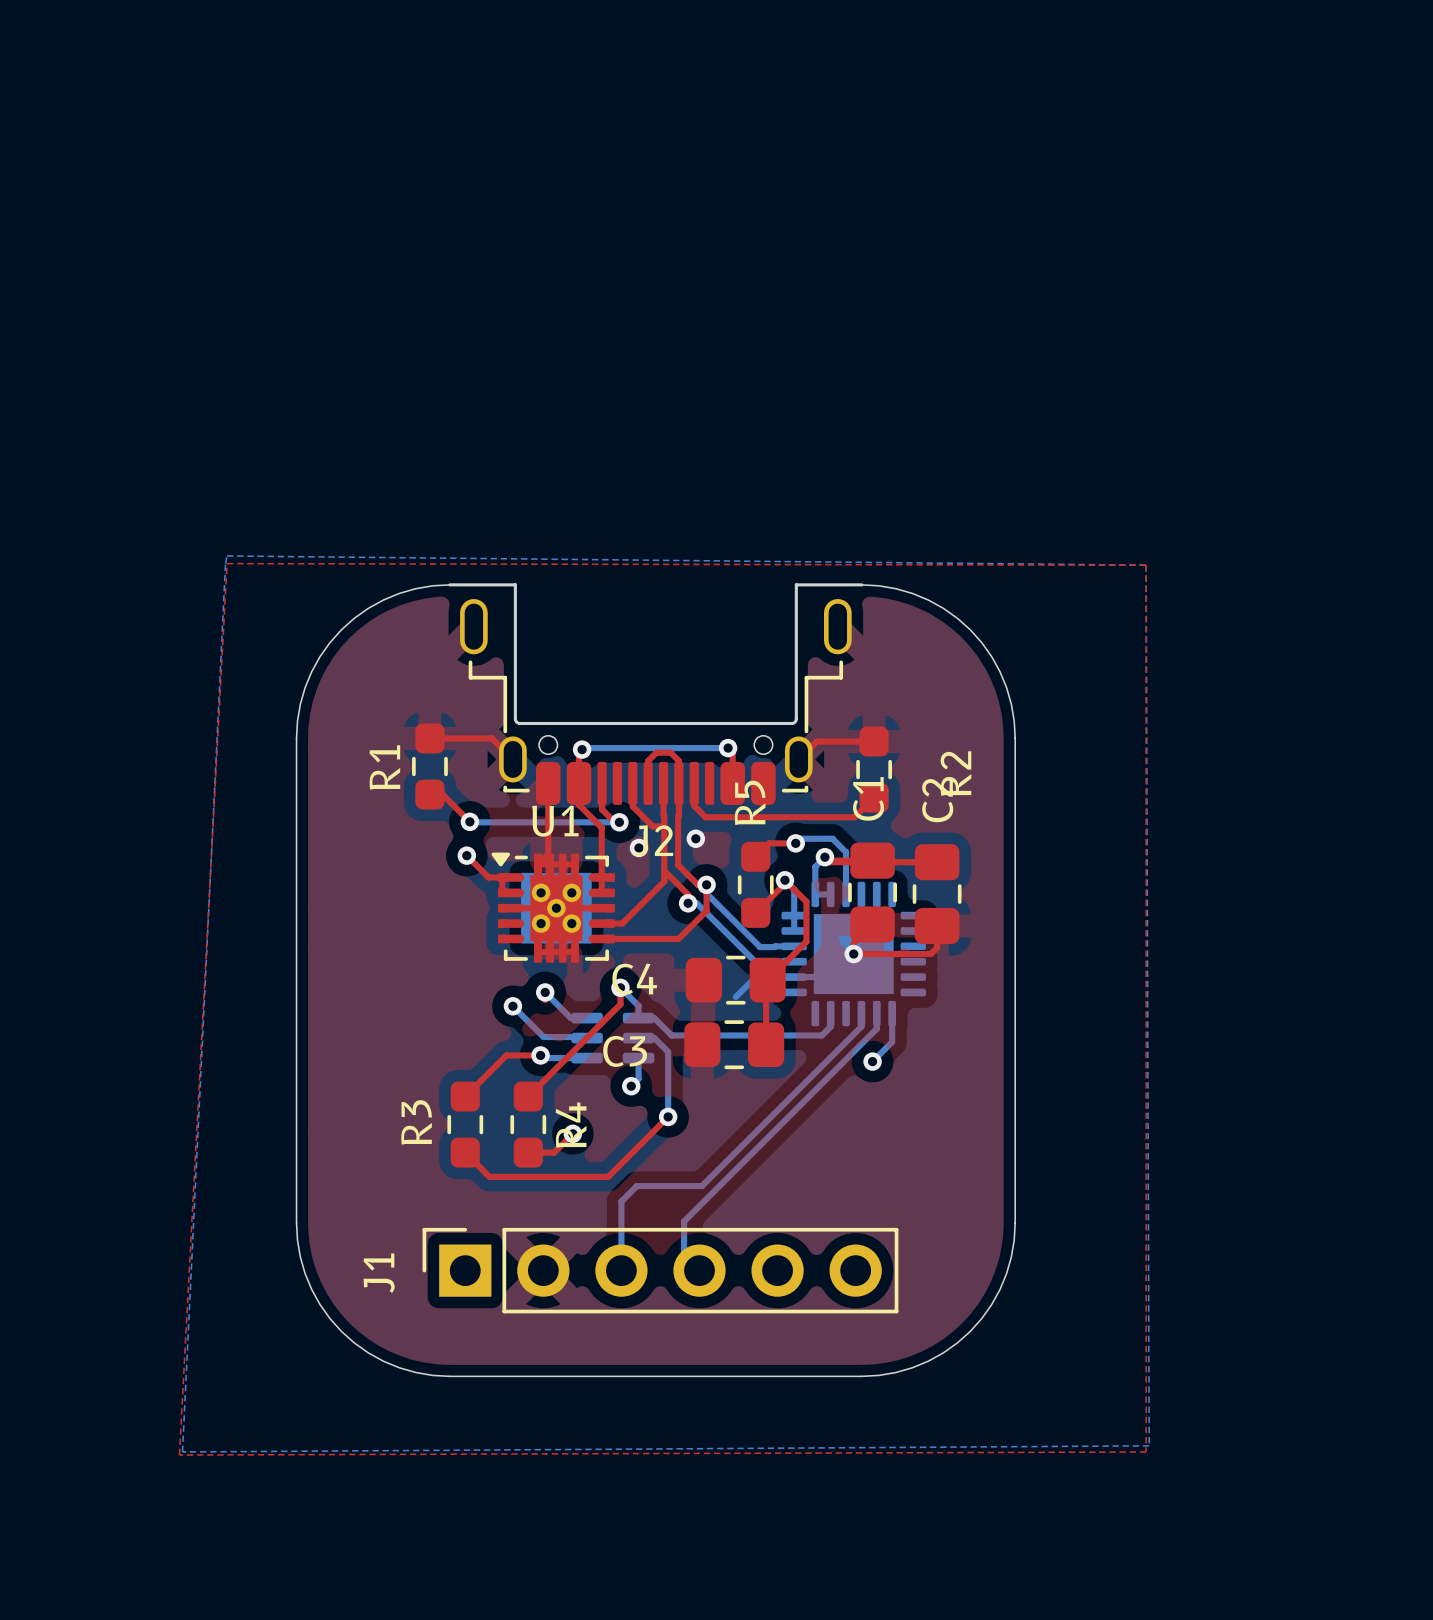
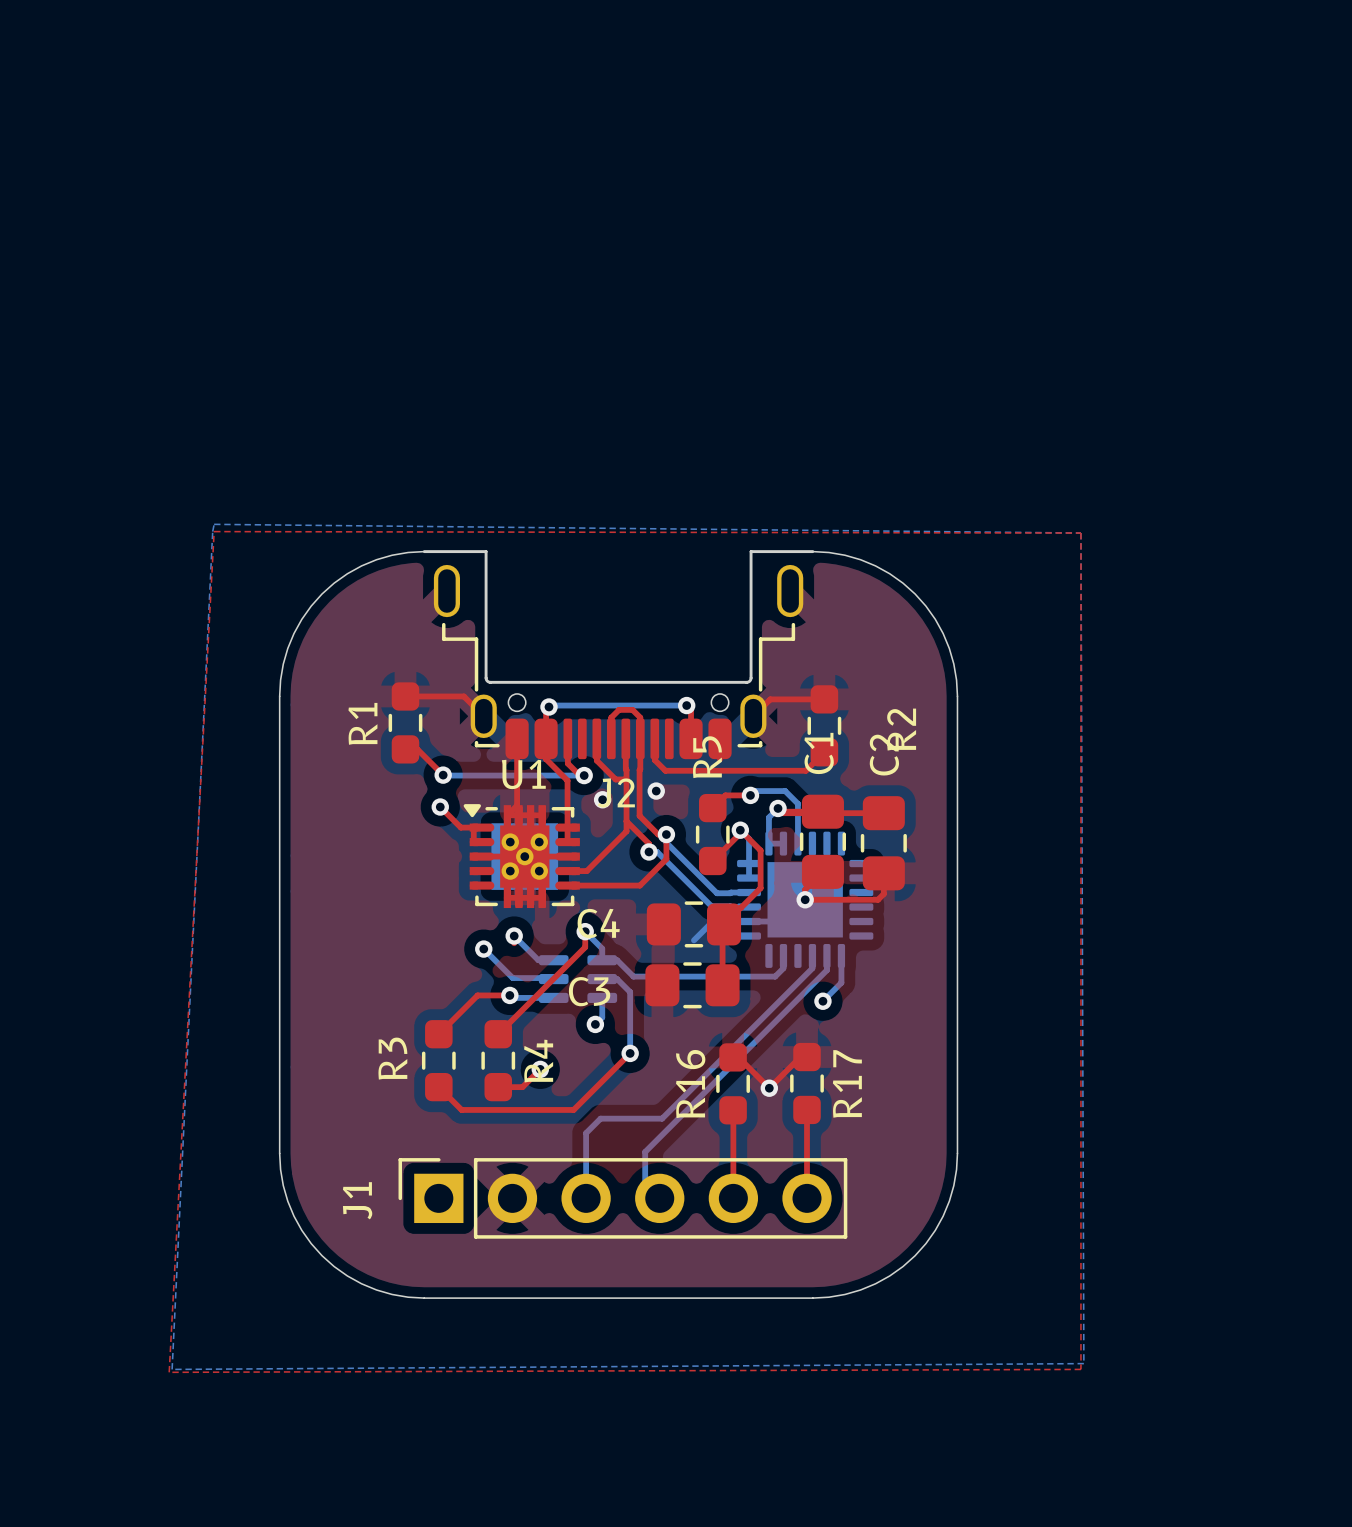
top track: none -> (800, 1050) (807, 1057) (800, 1057) (769, 1088) (738, 1057) (733, 1057)
R17: none -> (807, 1083)
R16: none -> (733, 1083)
via: none -> (769, 1088)
top track: none -> (807, 1109) (807, 1198)
top track: none -> (733, 1117) (733, 1198)

